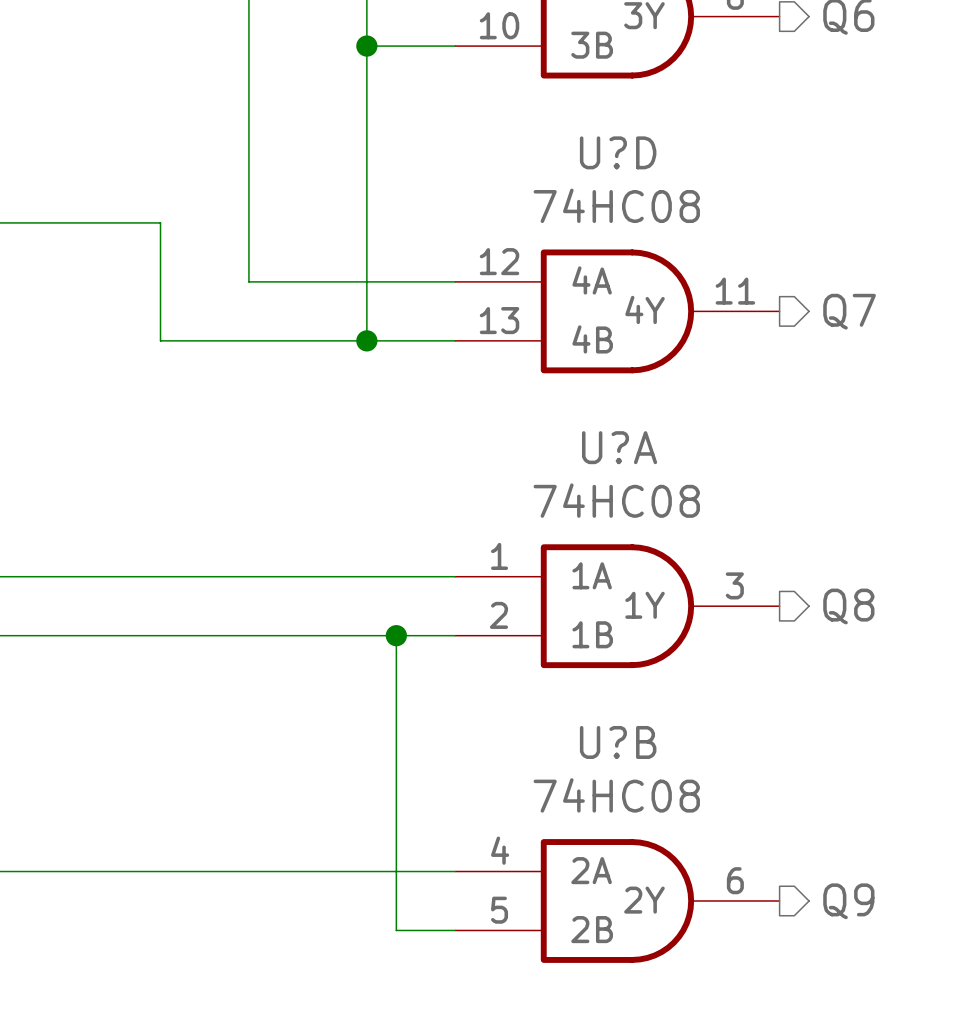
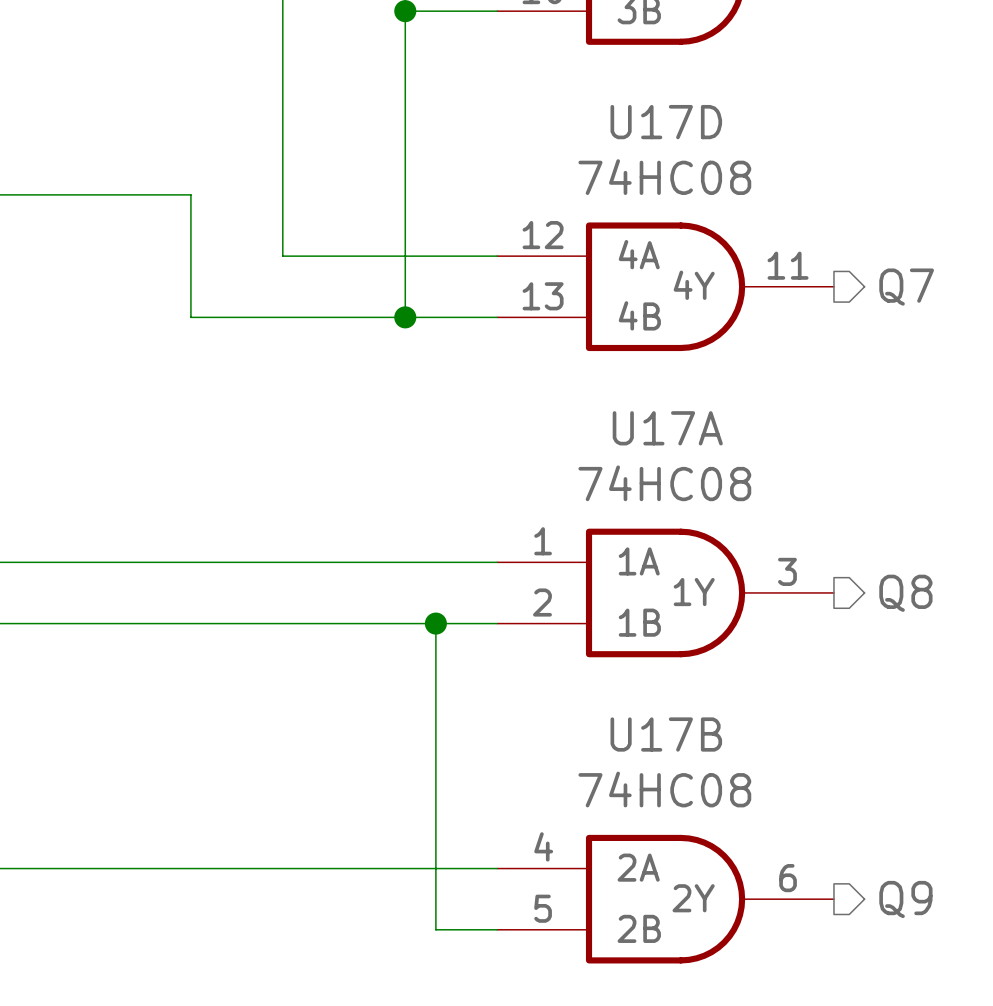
U?D name: U?D (618, 152) -> U17D (666, 122)
U?A name: U?A (619, 447) -> U17A (667, 428)
U?B name: U?B (618, 742) -> U17B (666, 734)

